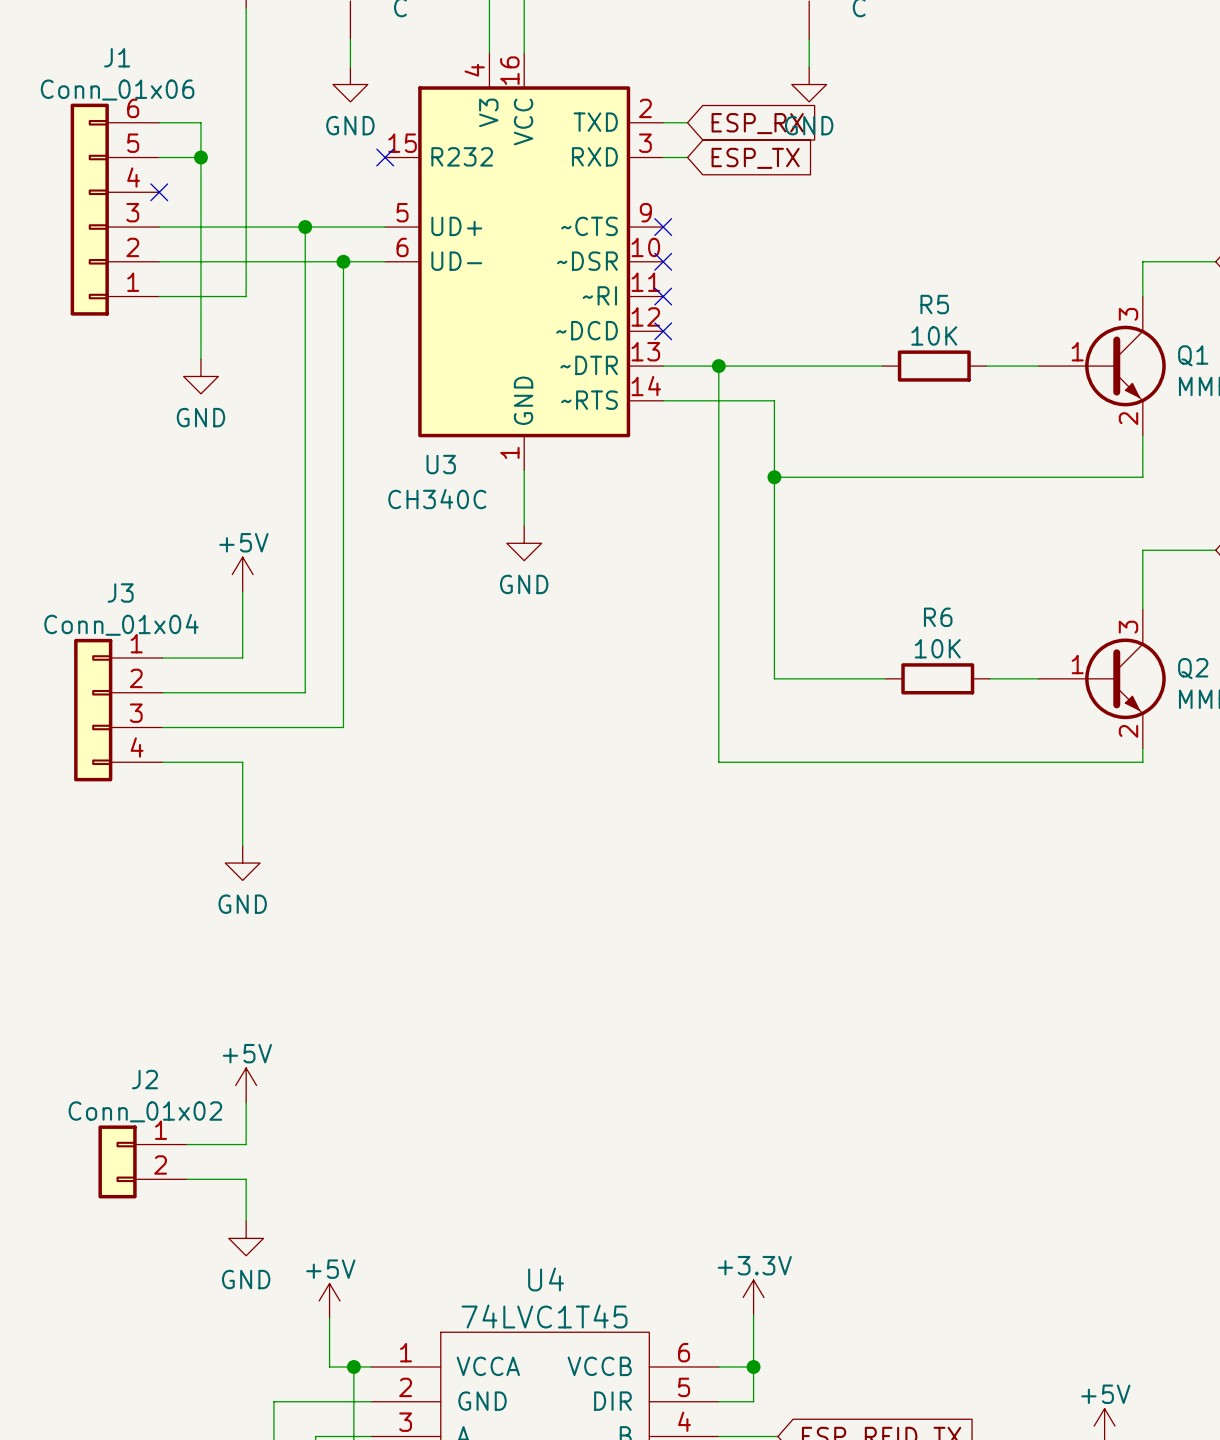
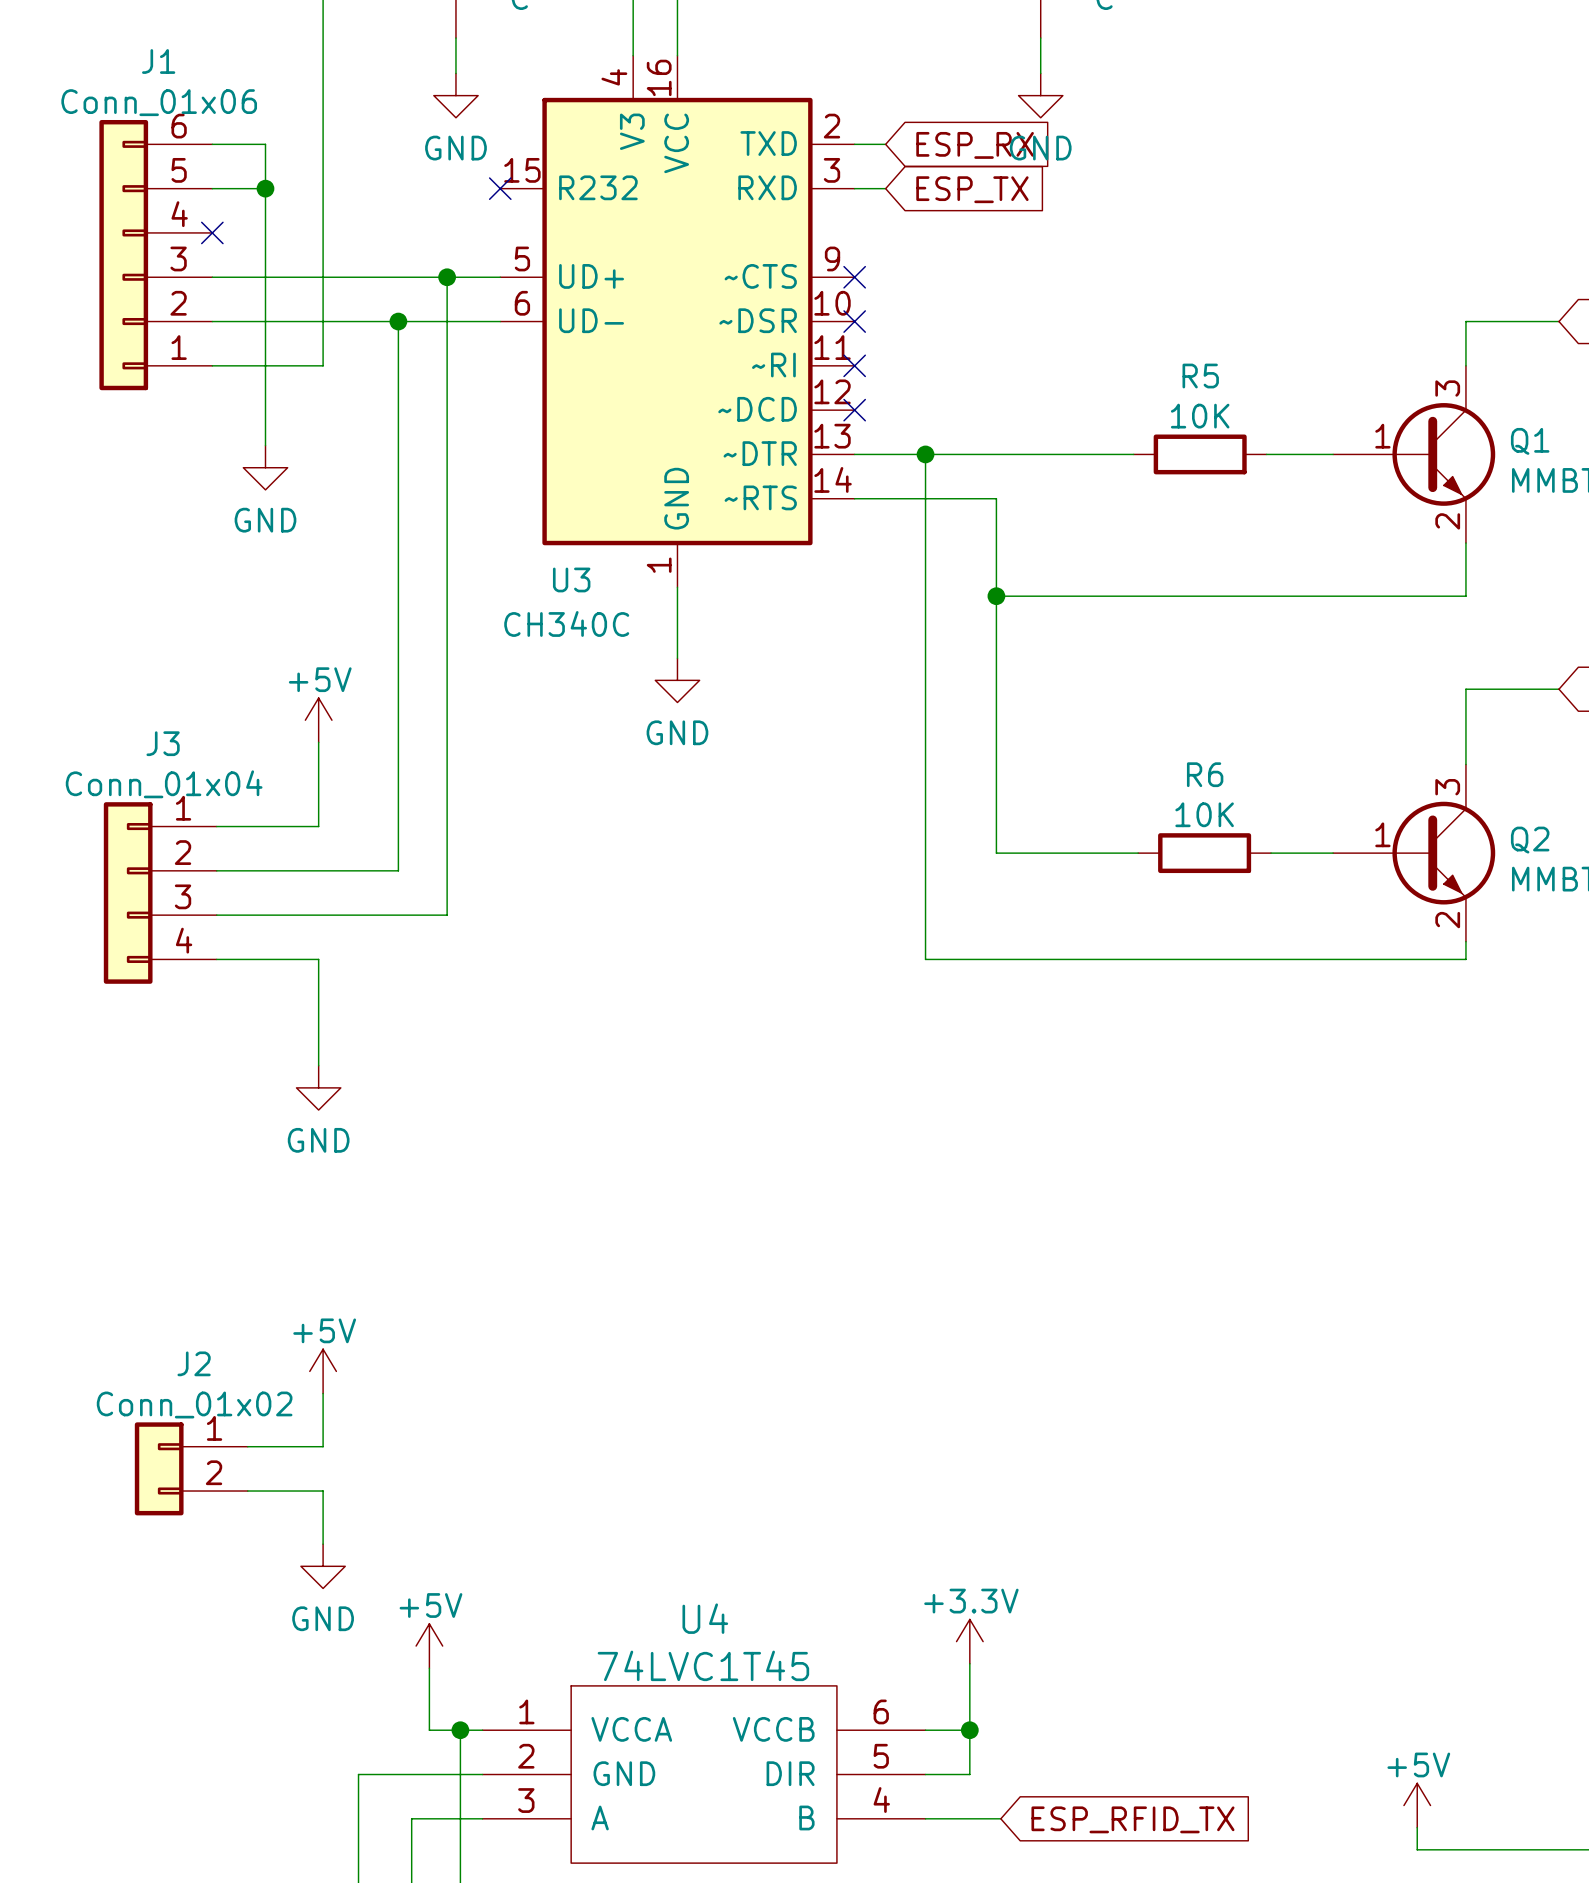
wire: (305, 227) (305, 261) -> (447, 277) (447, 321)
junction: (305, 227) -> none
junction: none -> (447, 277)
junction: none -> (398, 321)
junction: (343, 261) -> none

